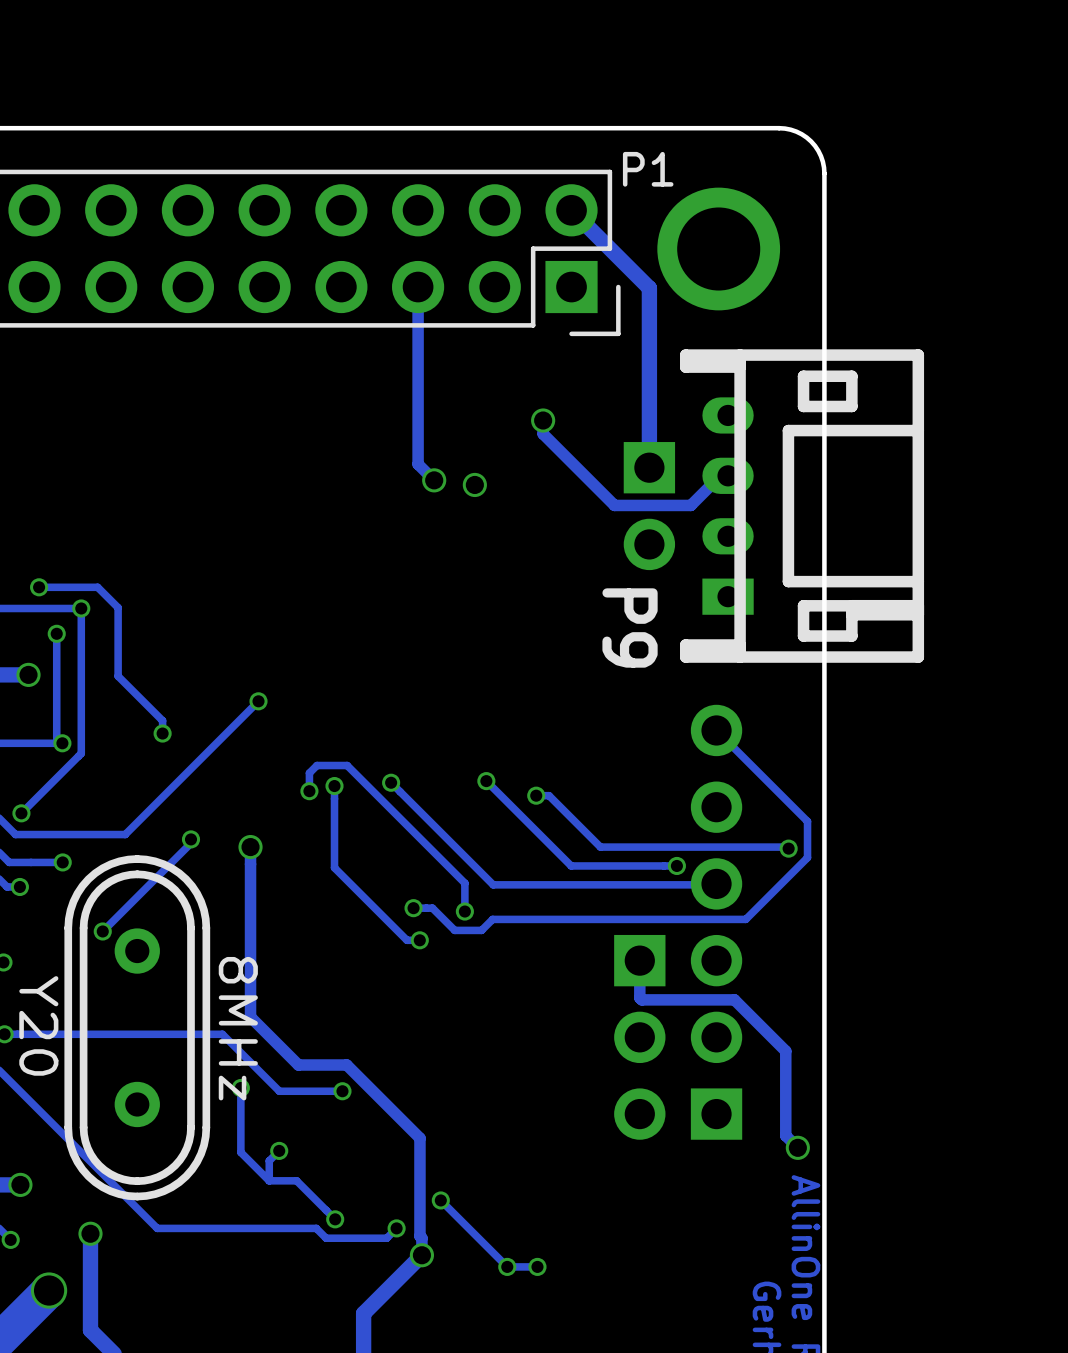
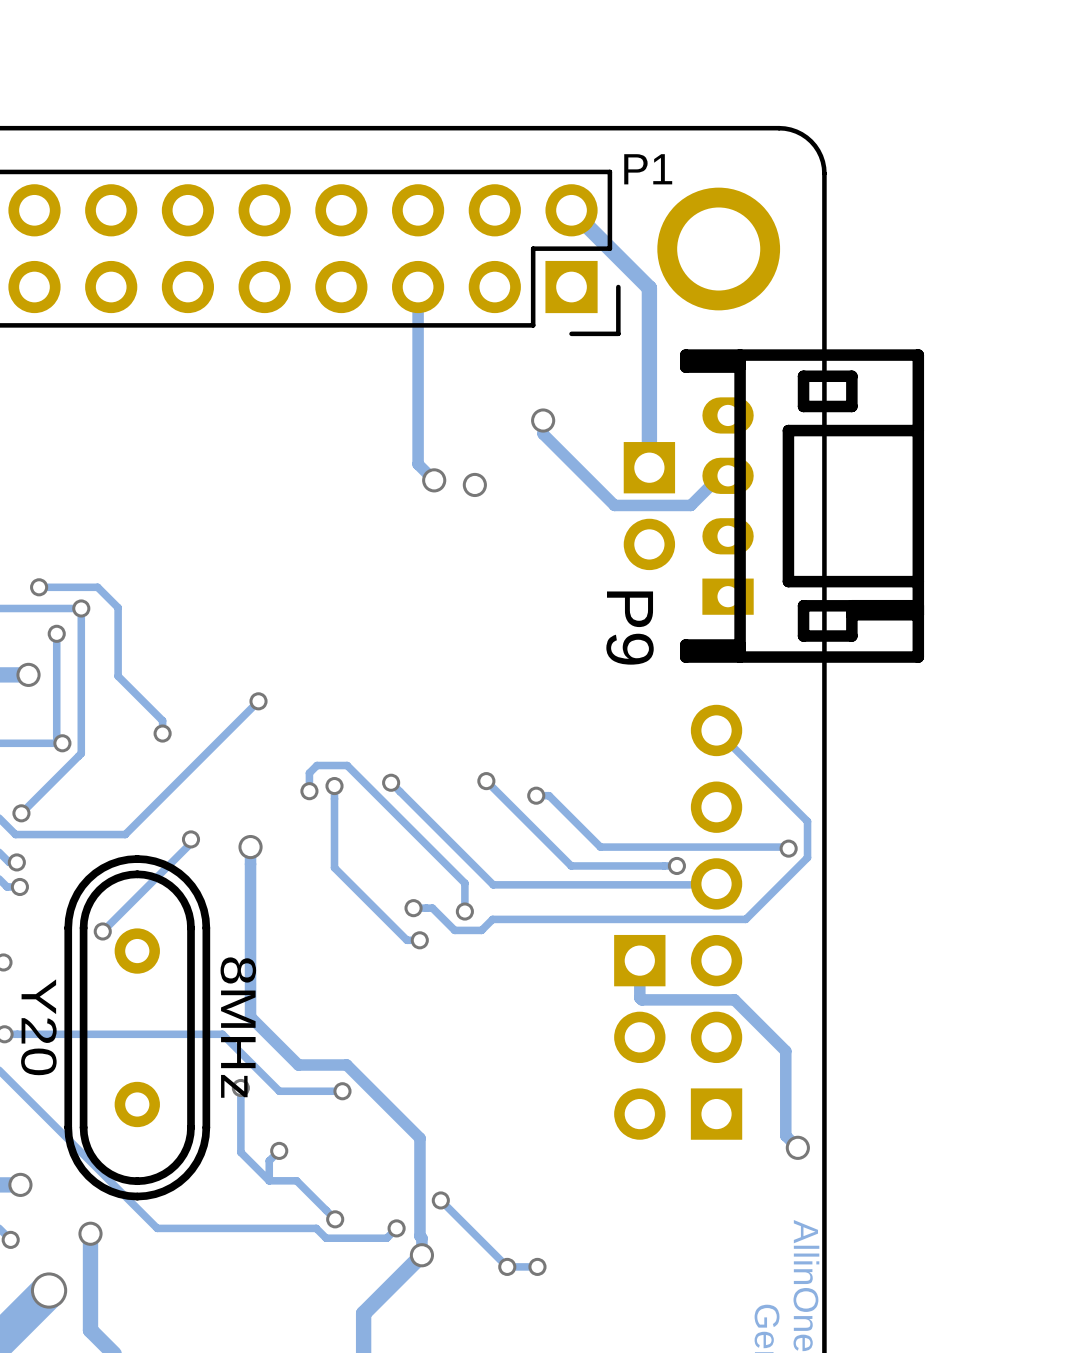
track: (62, 862) (16, 862) -> none
via position: (62, 862) -> (16, 862)

